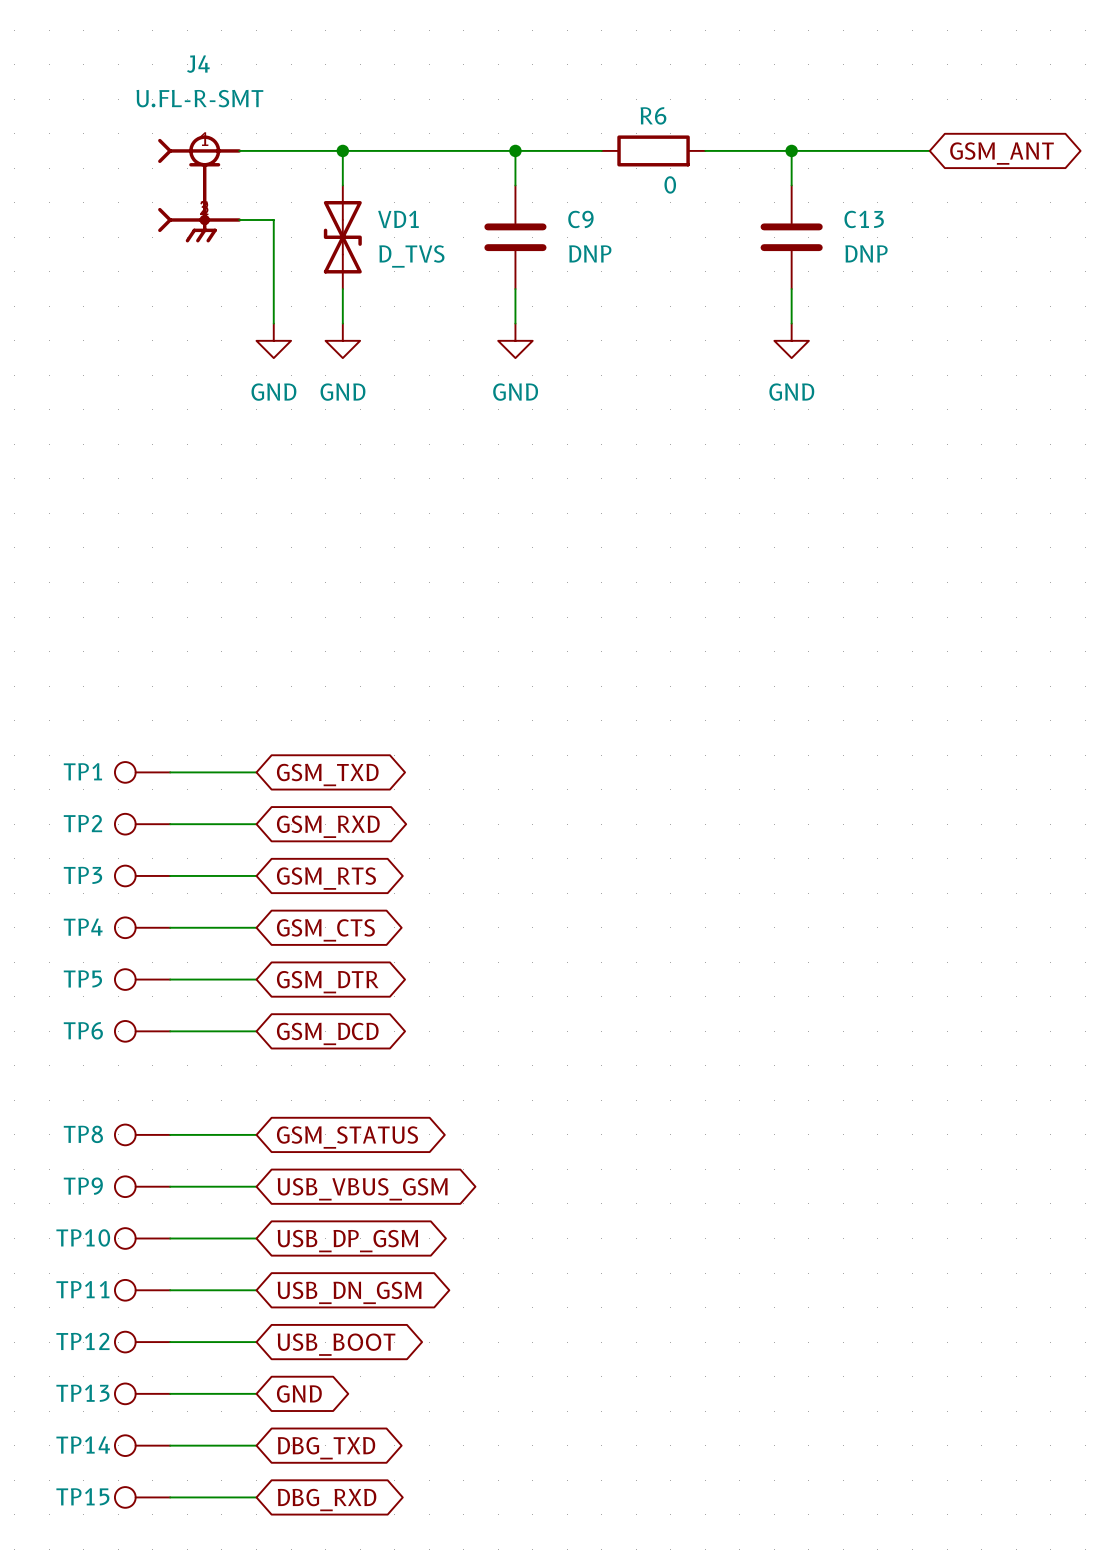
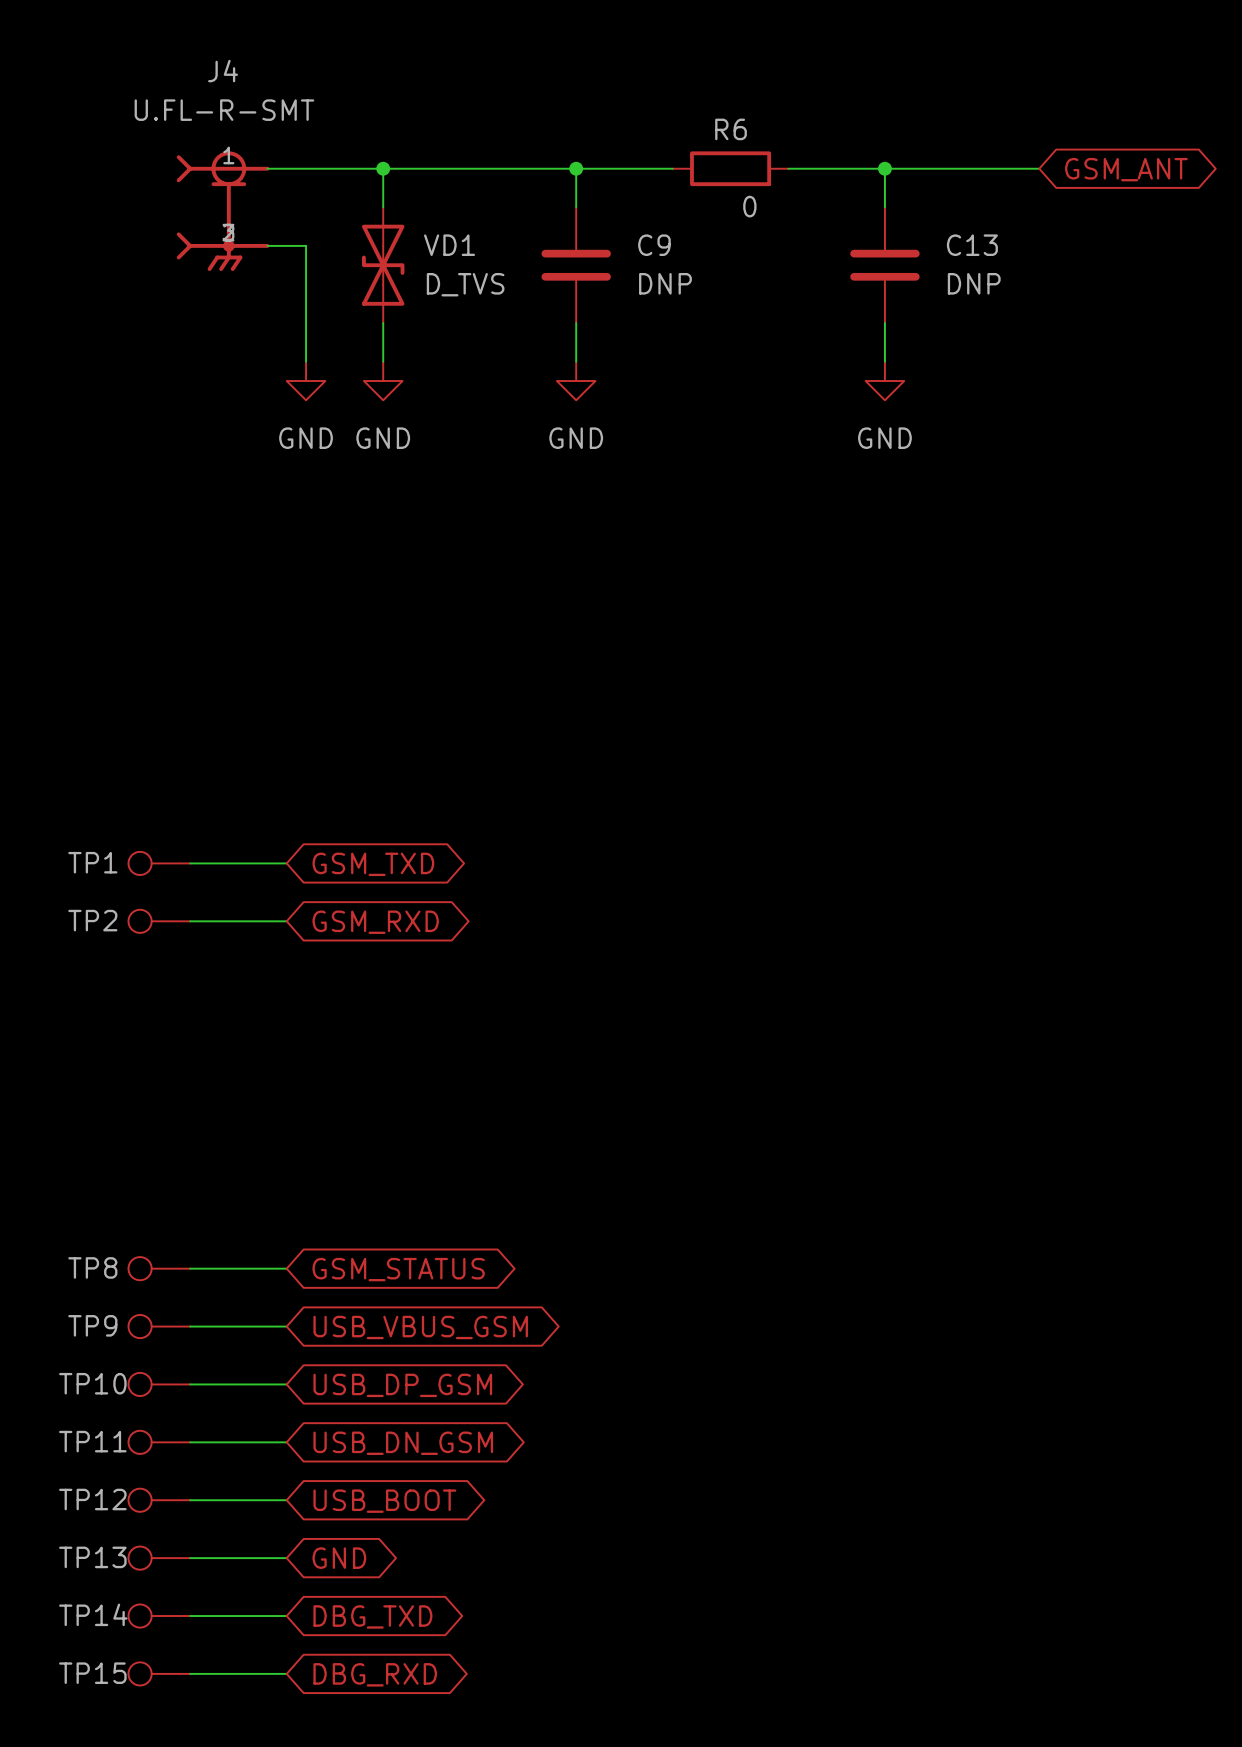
TP3: (142, 875) -> none
wire: (170, 875) (256, 875) -> none
global label: GSM_RTS (326, 878) -> none
TP4: (142, 927) -> none
wire: (170, 927) (256, 927) -> none
global label: GSM_CTS (325, 930) -> none
TP5: (142, 979) -> none
wire: (170, 979) (256, 979) -> none
global label: GSM_DTR (327, 982) -> none
TP6: (142, 1031) -> none
wire: (170, 1031) (256, 1031) -> none
global label: GSM_DCD (327, 1033) -> none

